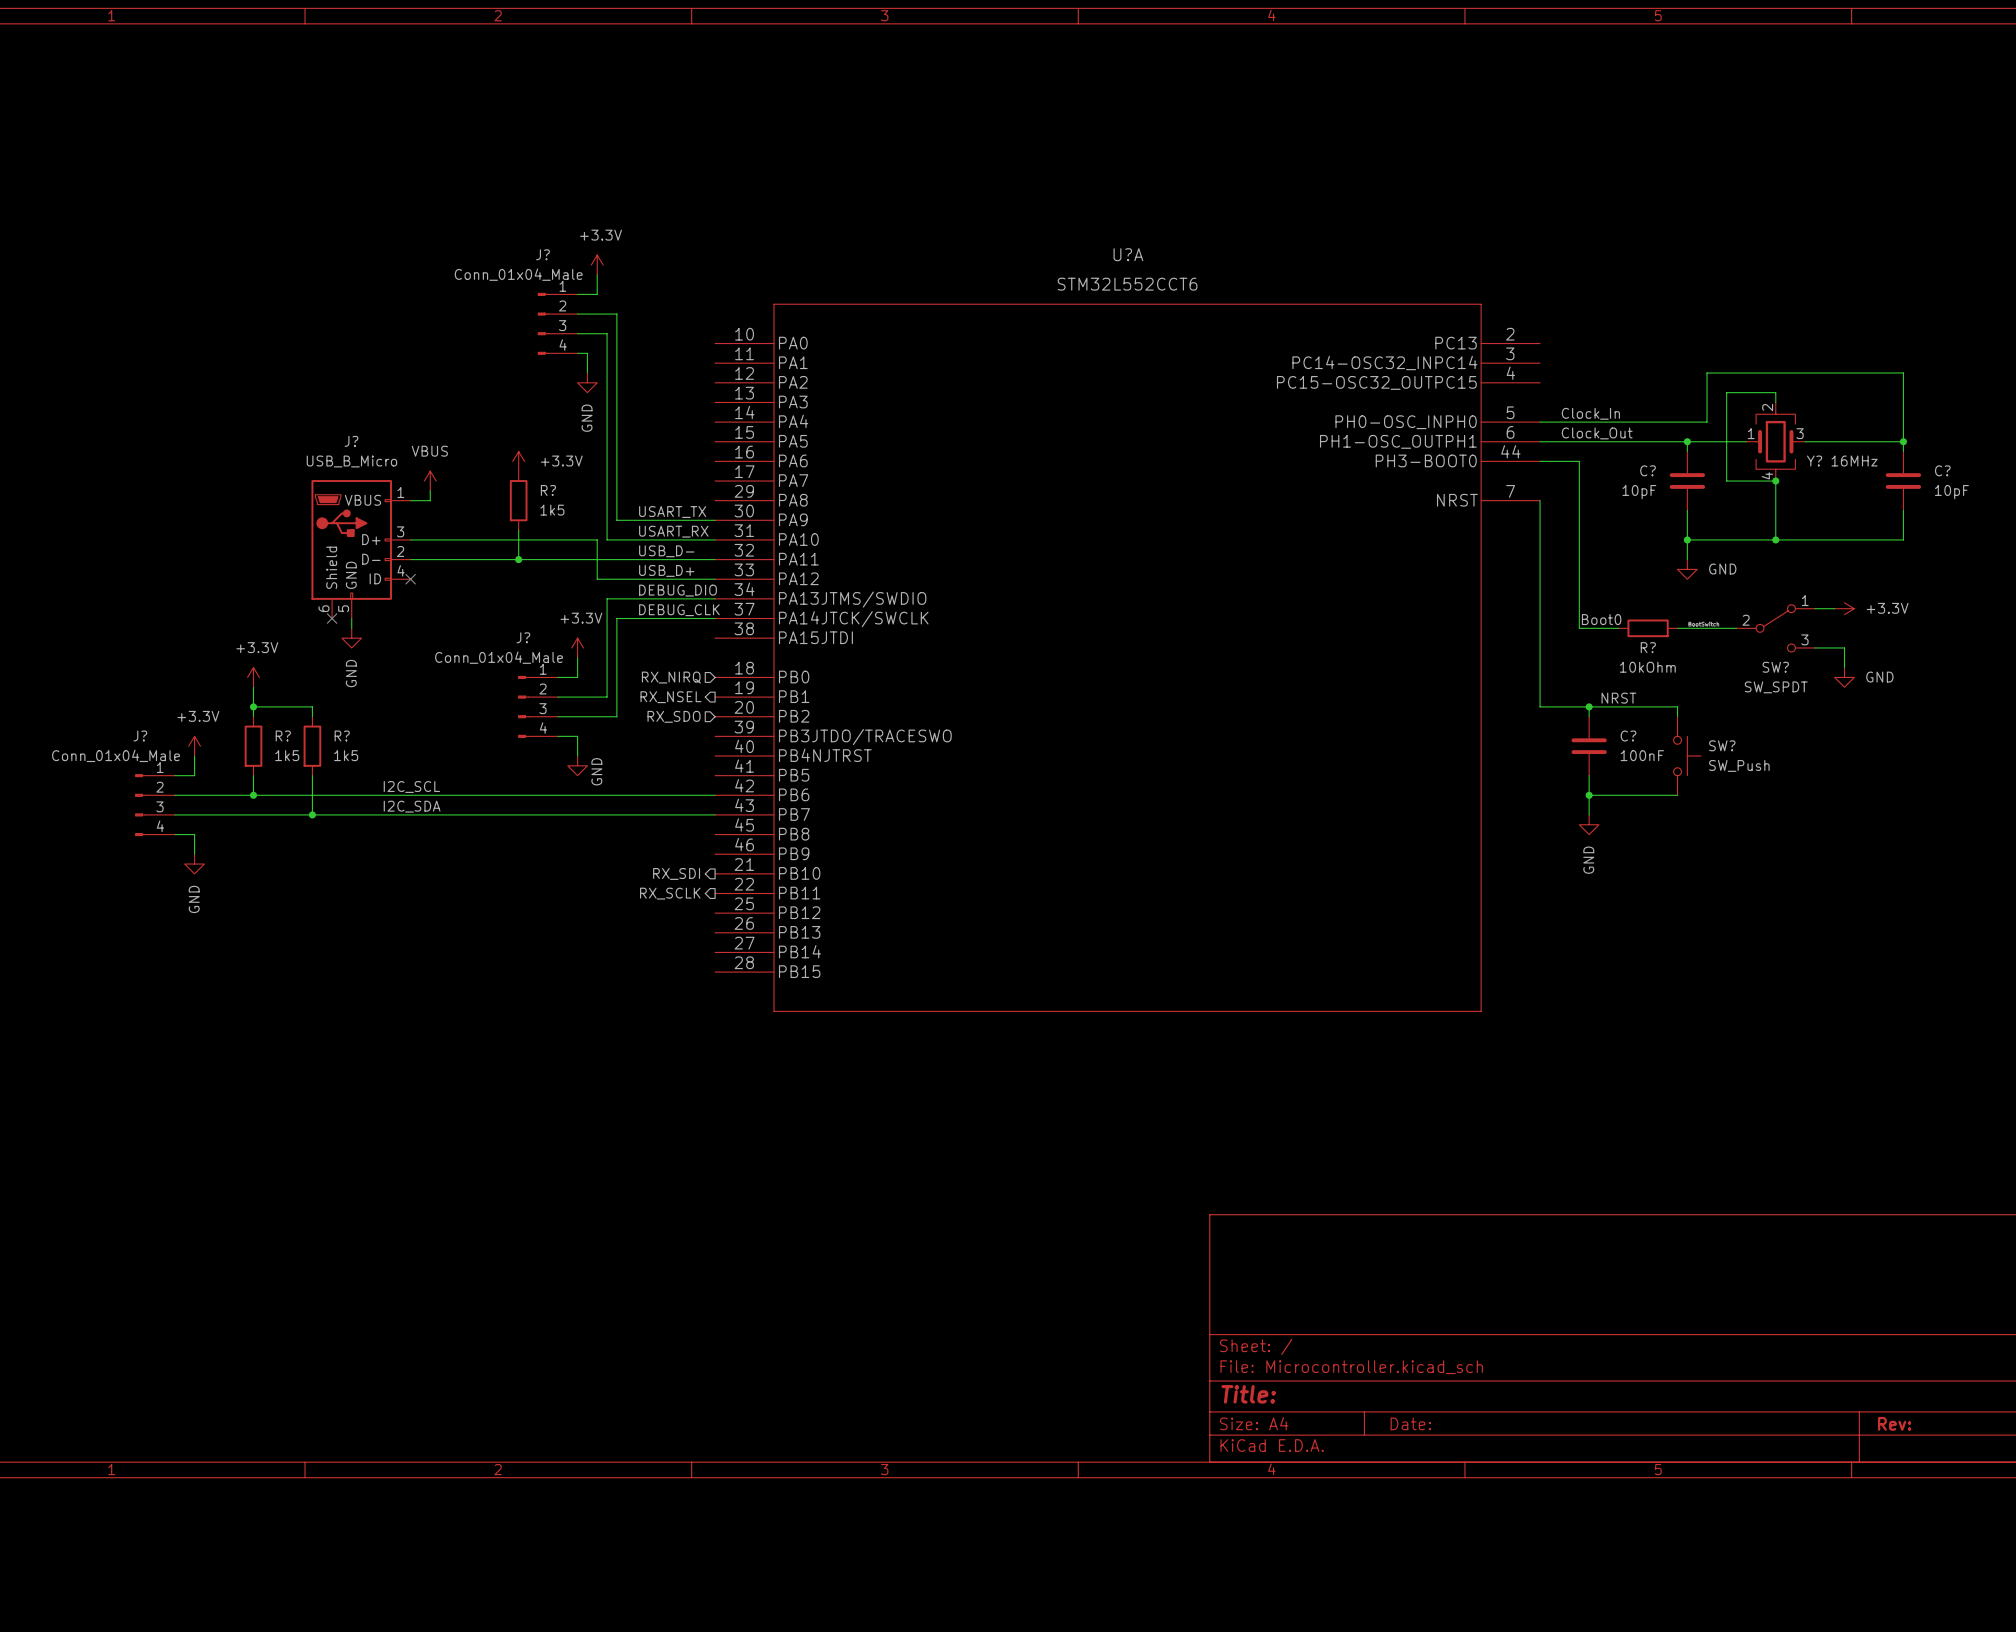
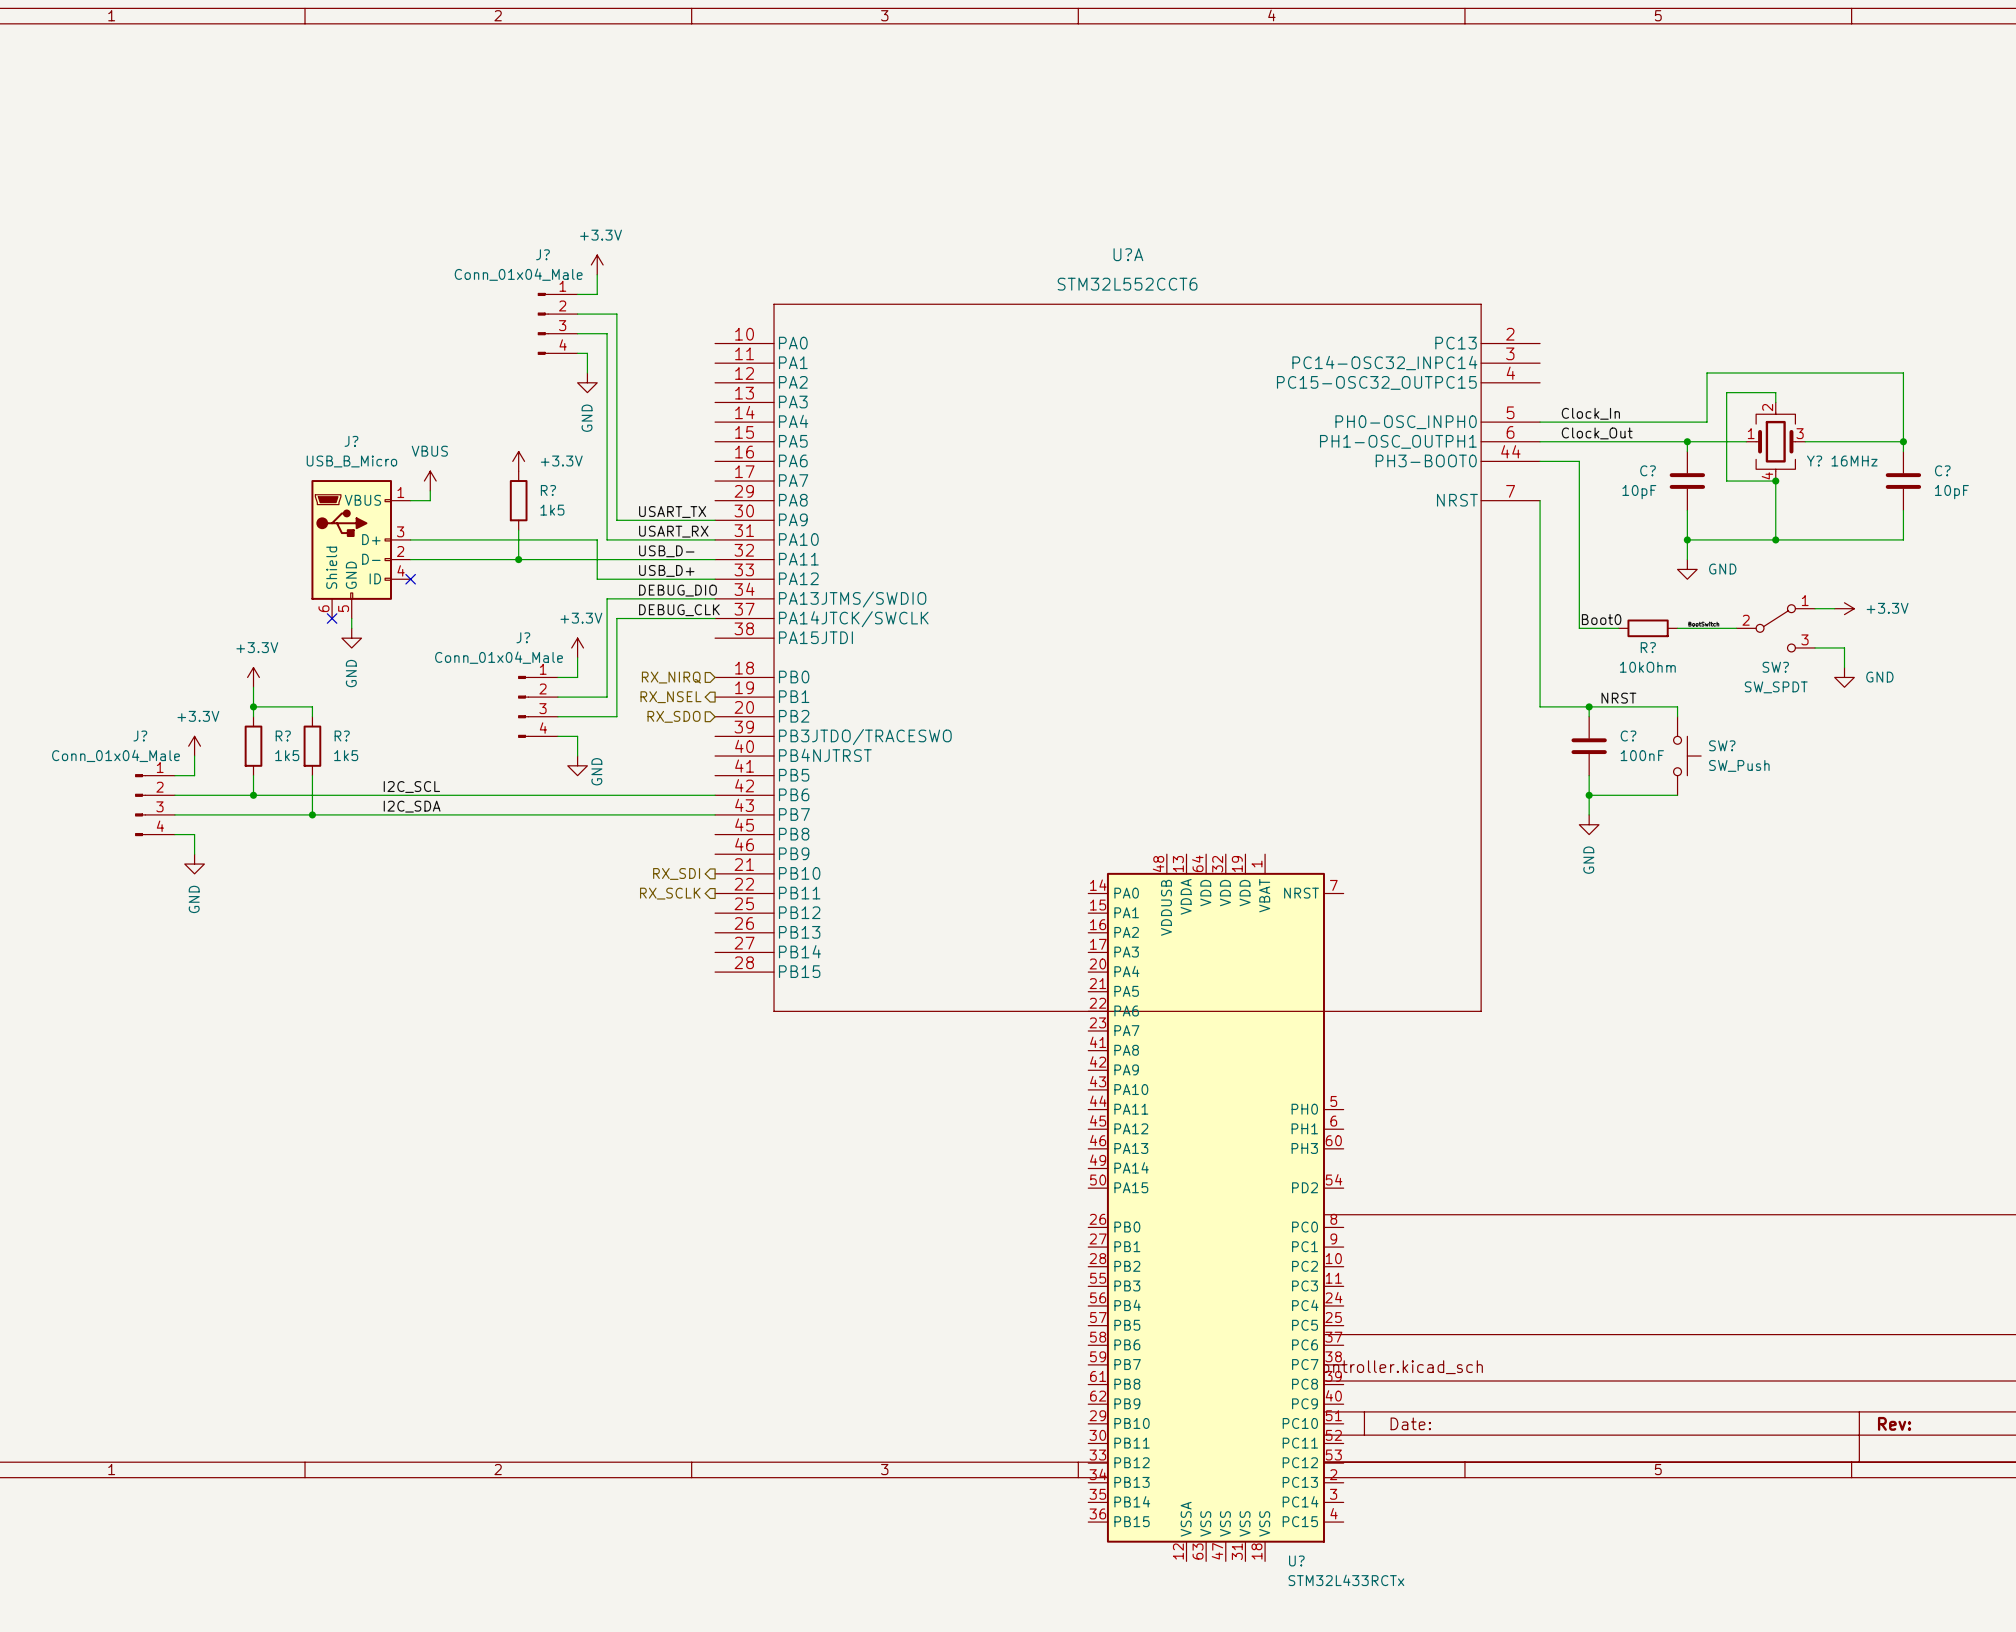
U?: none -> STM32L433RCTx (1215, 1207)

